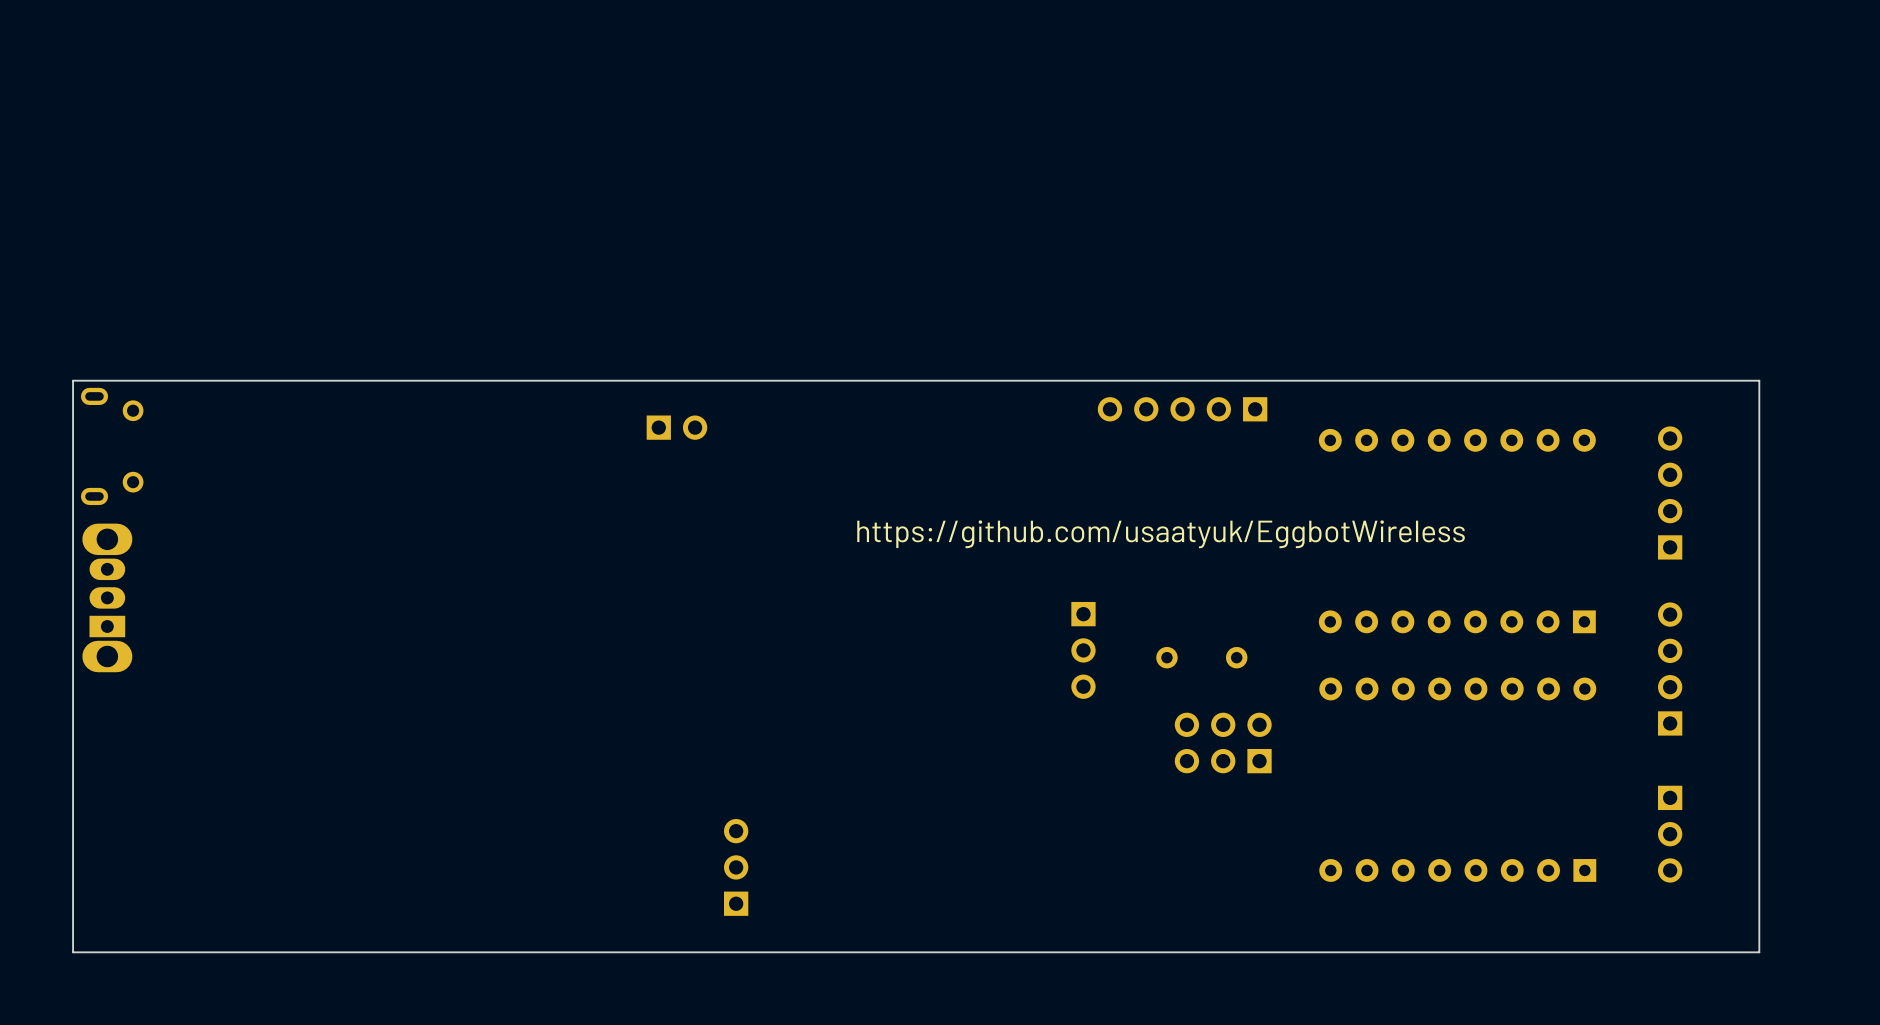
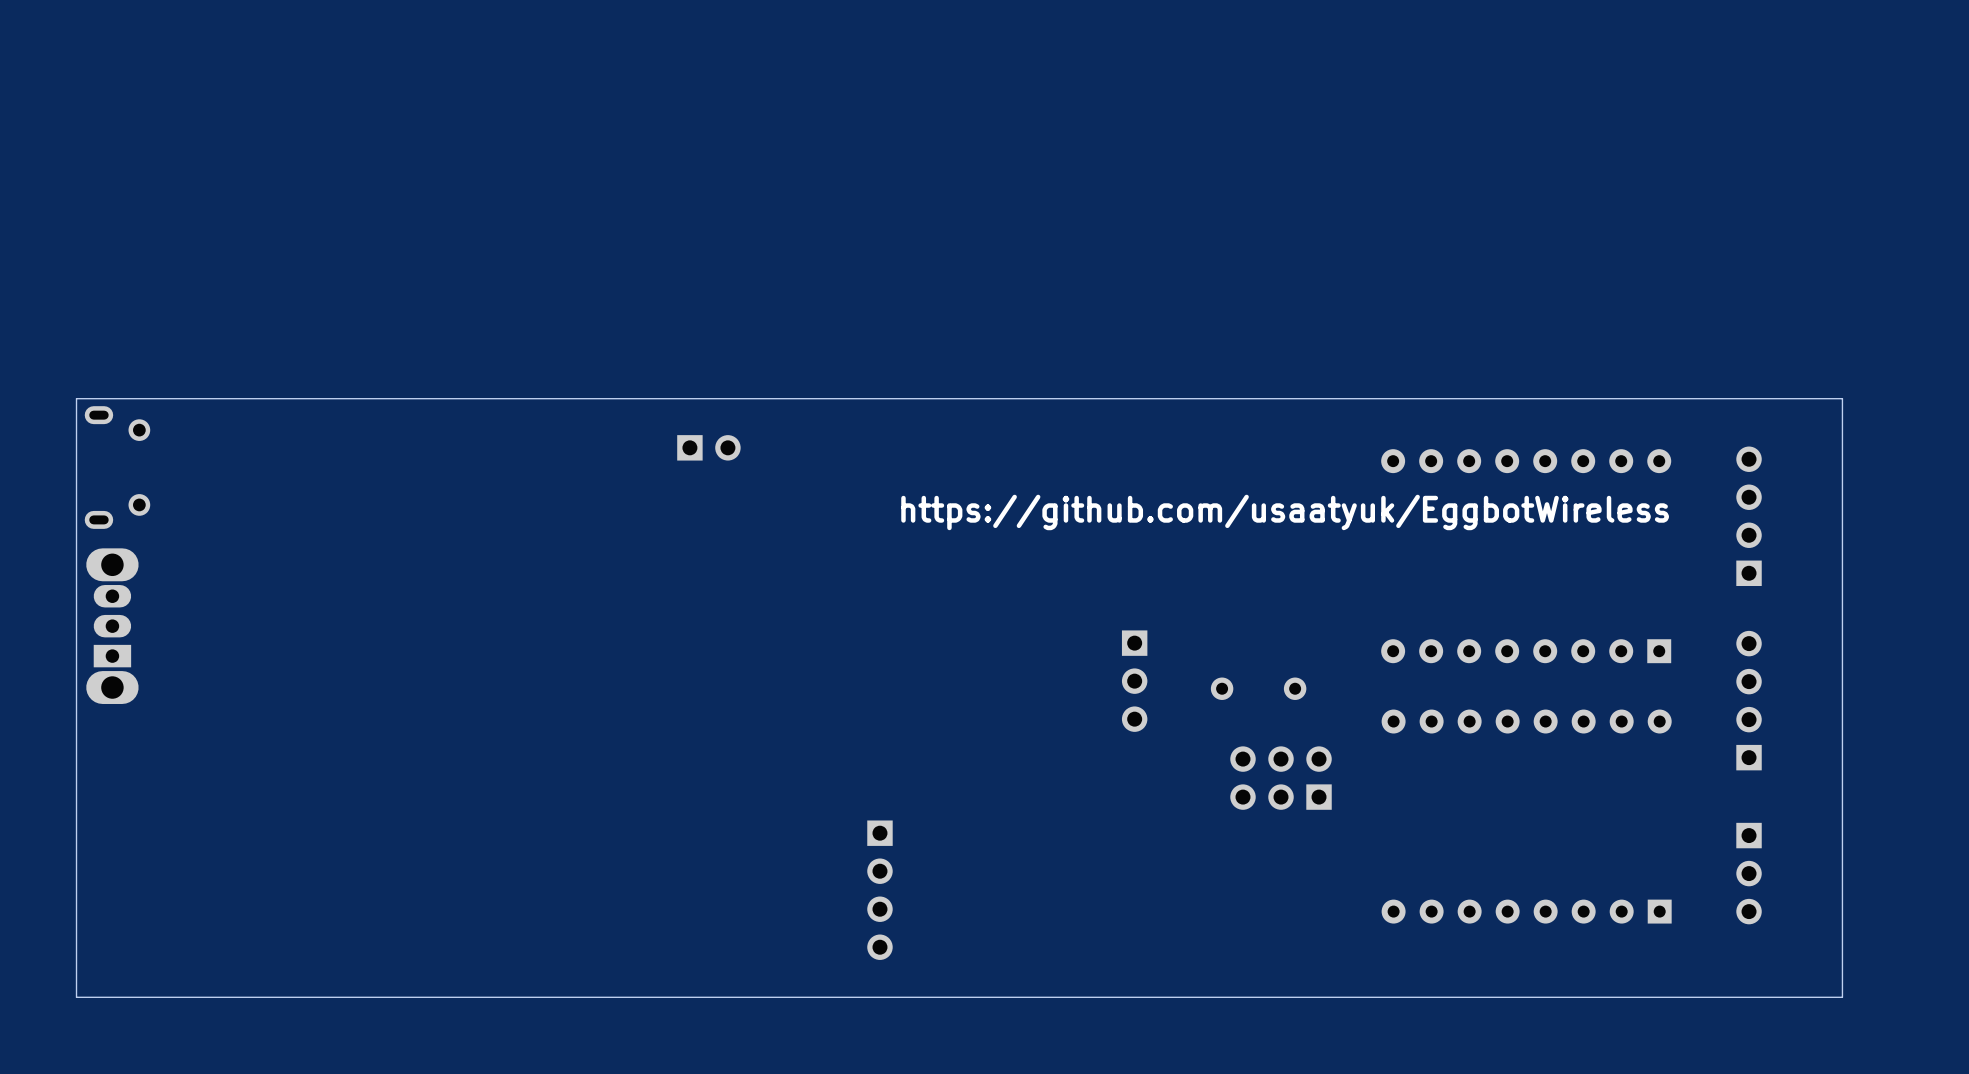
part: (1182, 409) -> none
text position: https://github.com/usaatyuk/EggbotWireless (1161, 534) -> https://github.com/usaatyuk/EggbotWireless (1285, 512)
part: none -> (879, 890)
part: (736, 867) -> none

